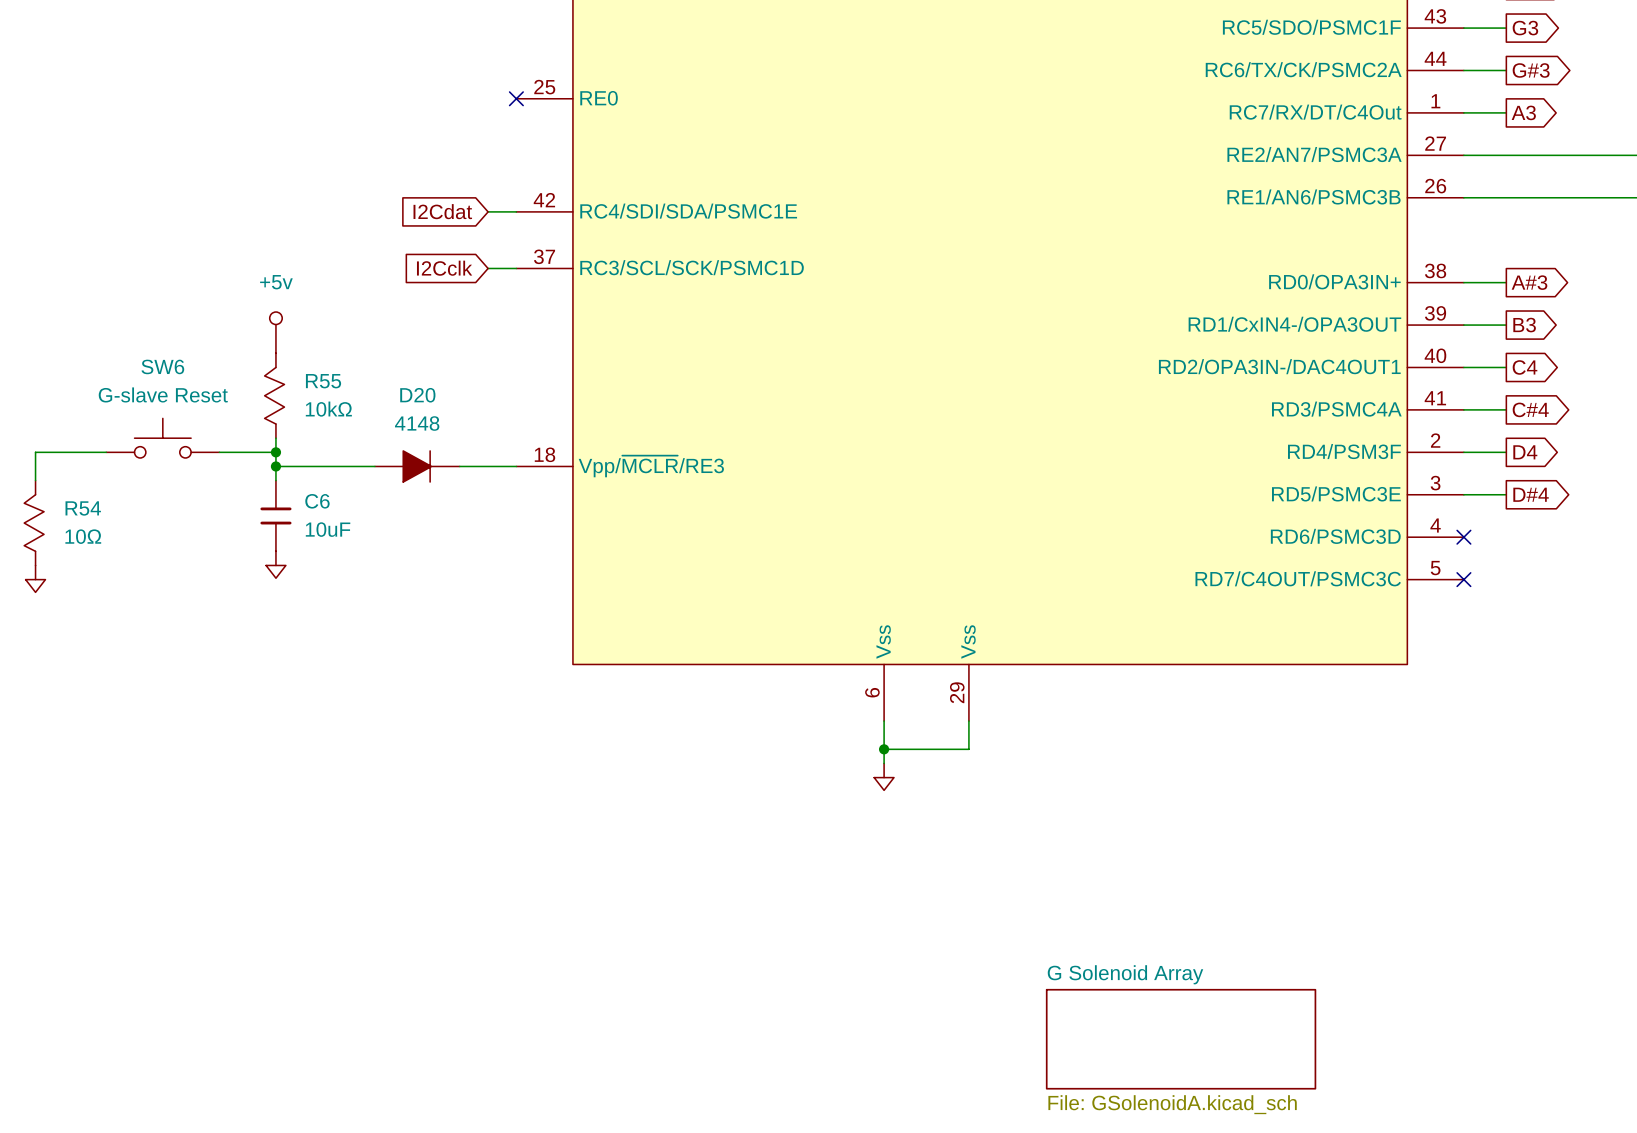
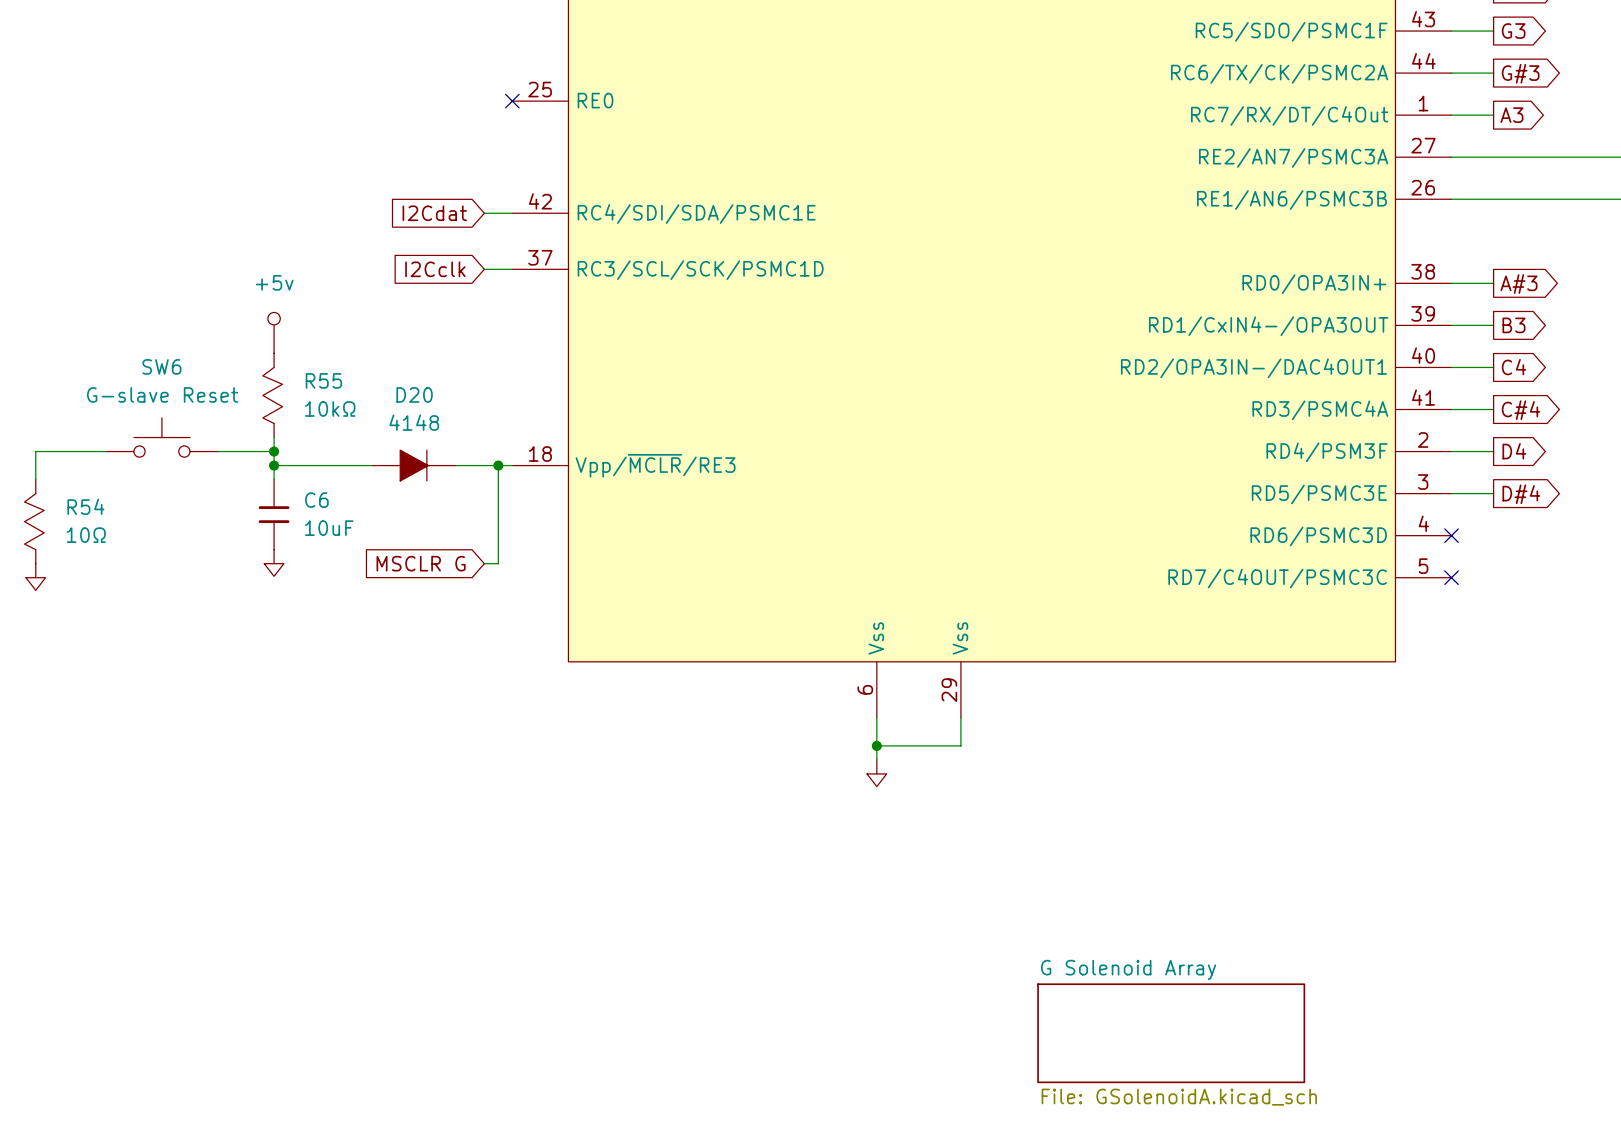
wire: none -> (498, 465) (498, 563) (484, 563)
junction: none -> (498, 465)
global label: none -> MSCLR G (421, 563)

